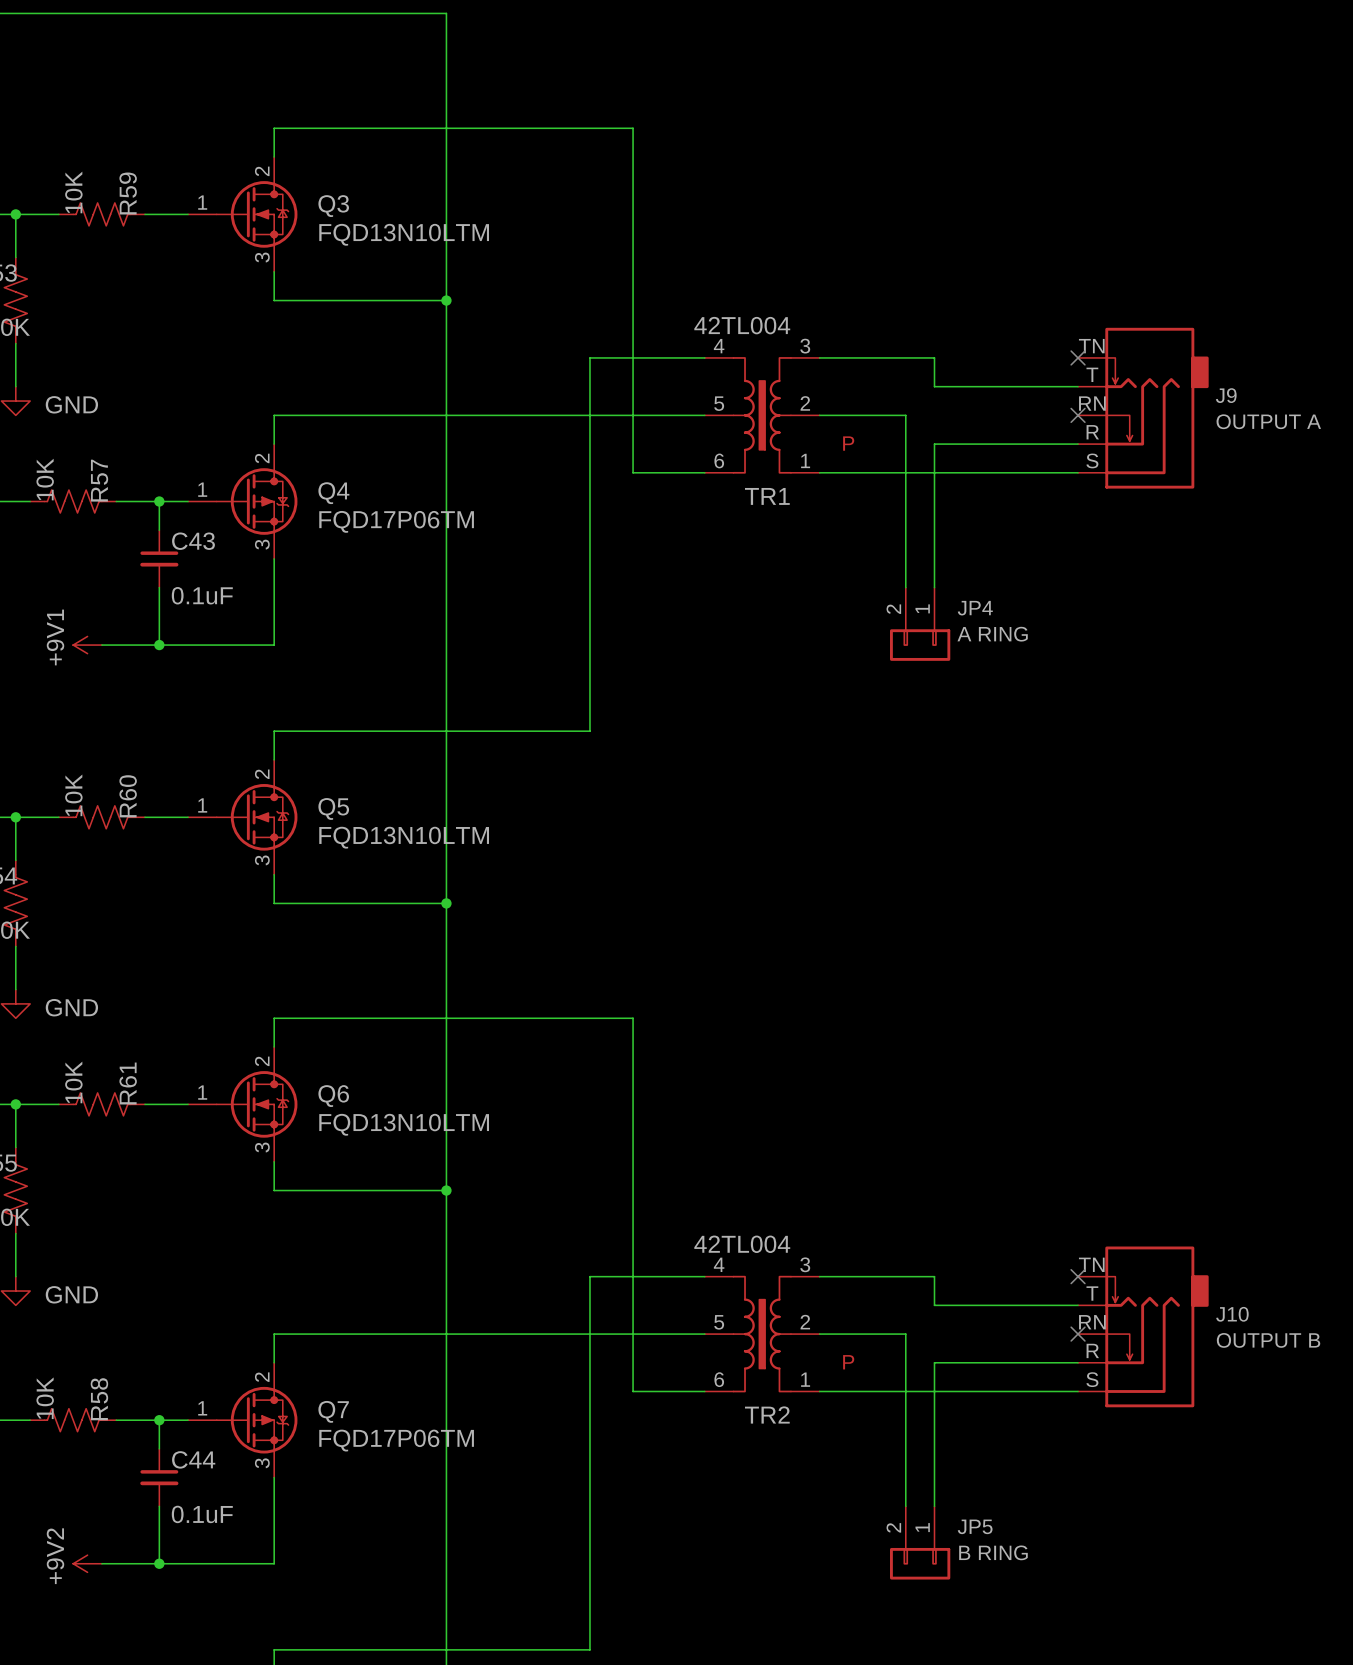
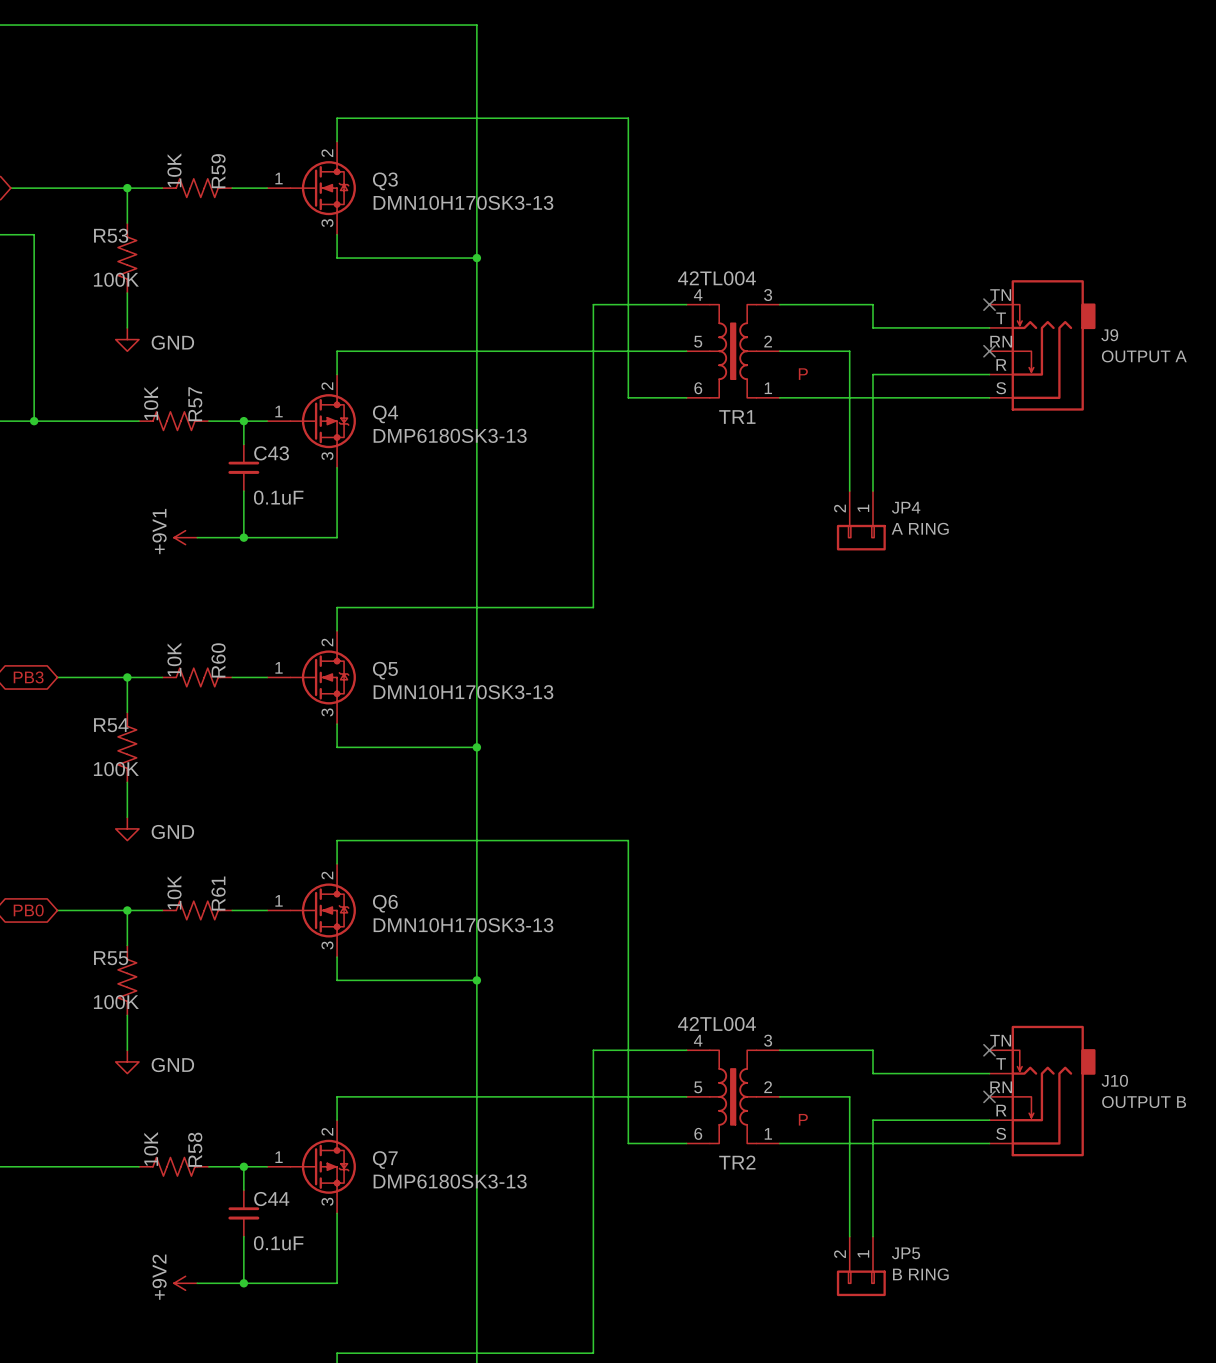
Q3 value: FQD13N10LTM (404, 234) -> DMN10H170SK3-13 (463, 202)
Q4 value: FQD17P06TM (396, 521) -> DMP6180SK3-13 (450, 435)
Q5 value: FQD13N10LTM (404, 837) -> DMN10H170SK3-13 (463, 692)
Q6 value: FQD13N10LTM (404, 1124) -> DMN10H170SK3-13 (463, 925)
Q7 value: FQD17P06TM (396, 1440) -> DMP6180SK3-13 (450, 1181)

